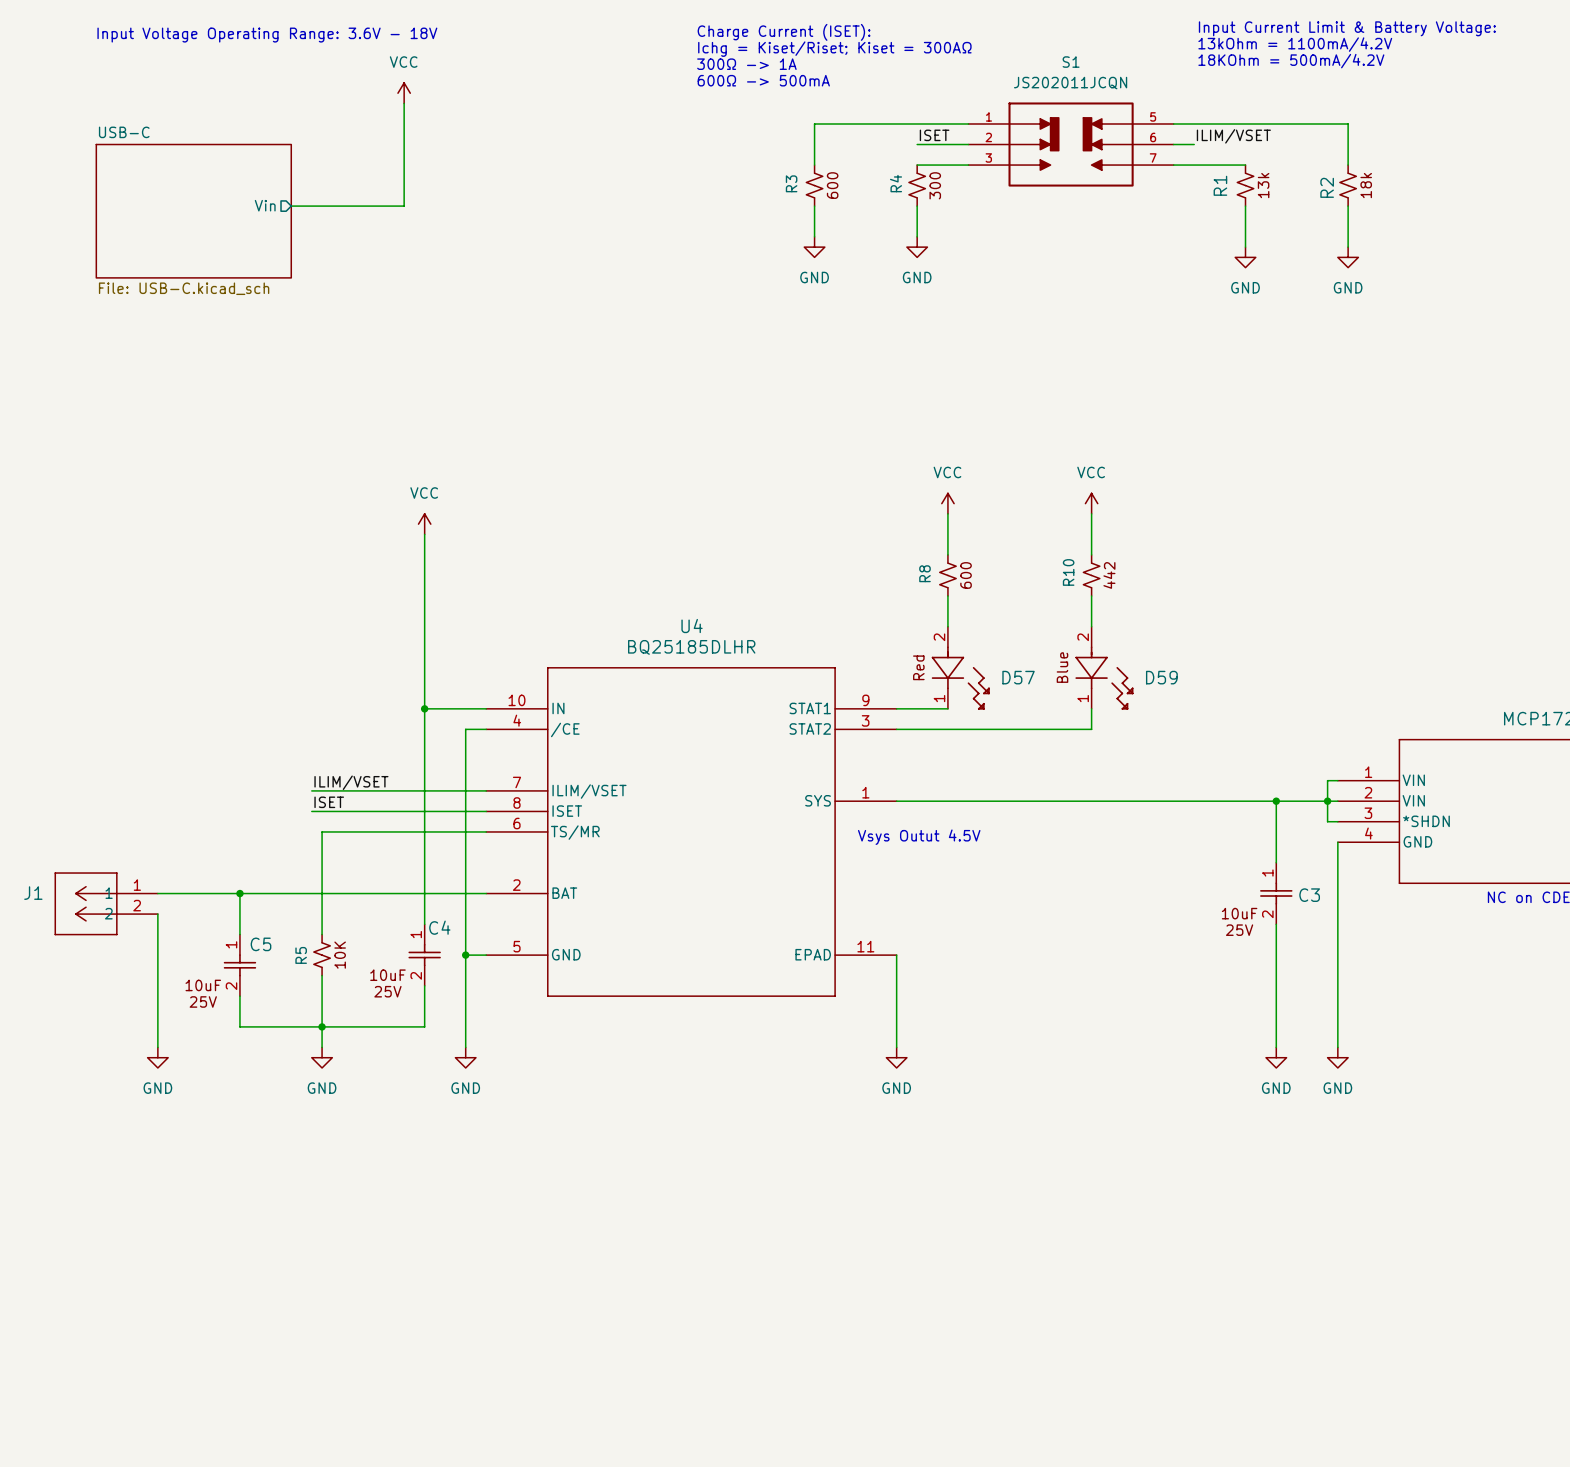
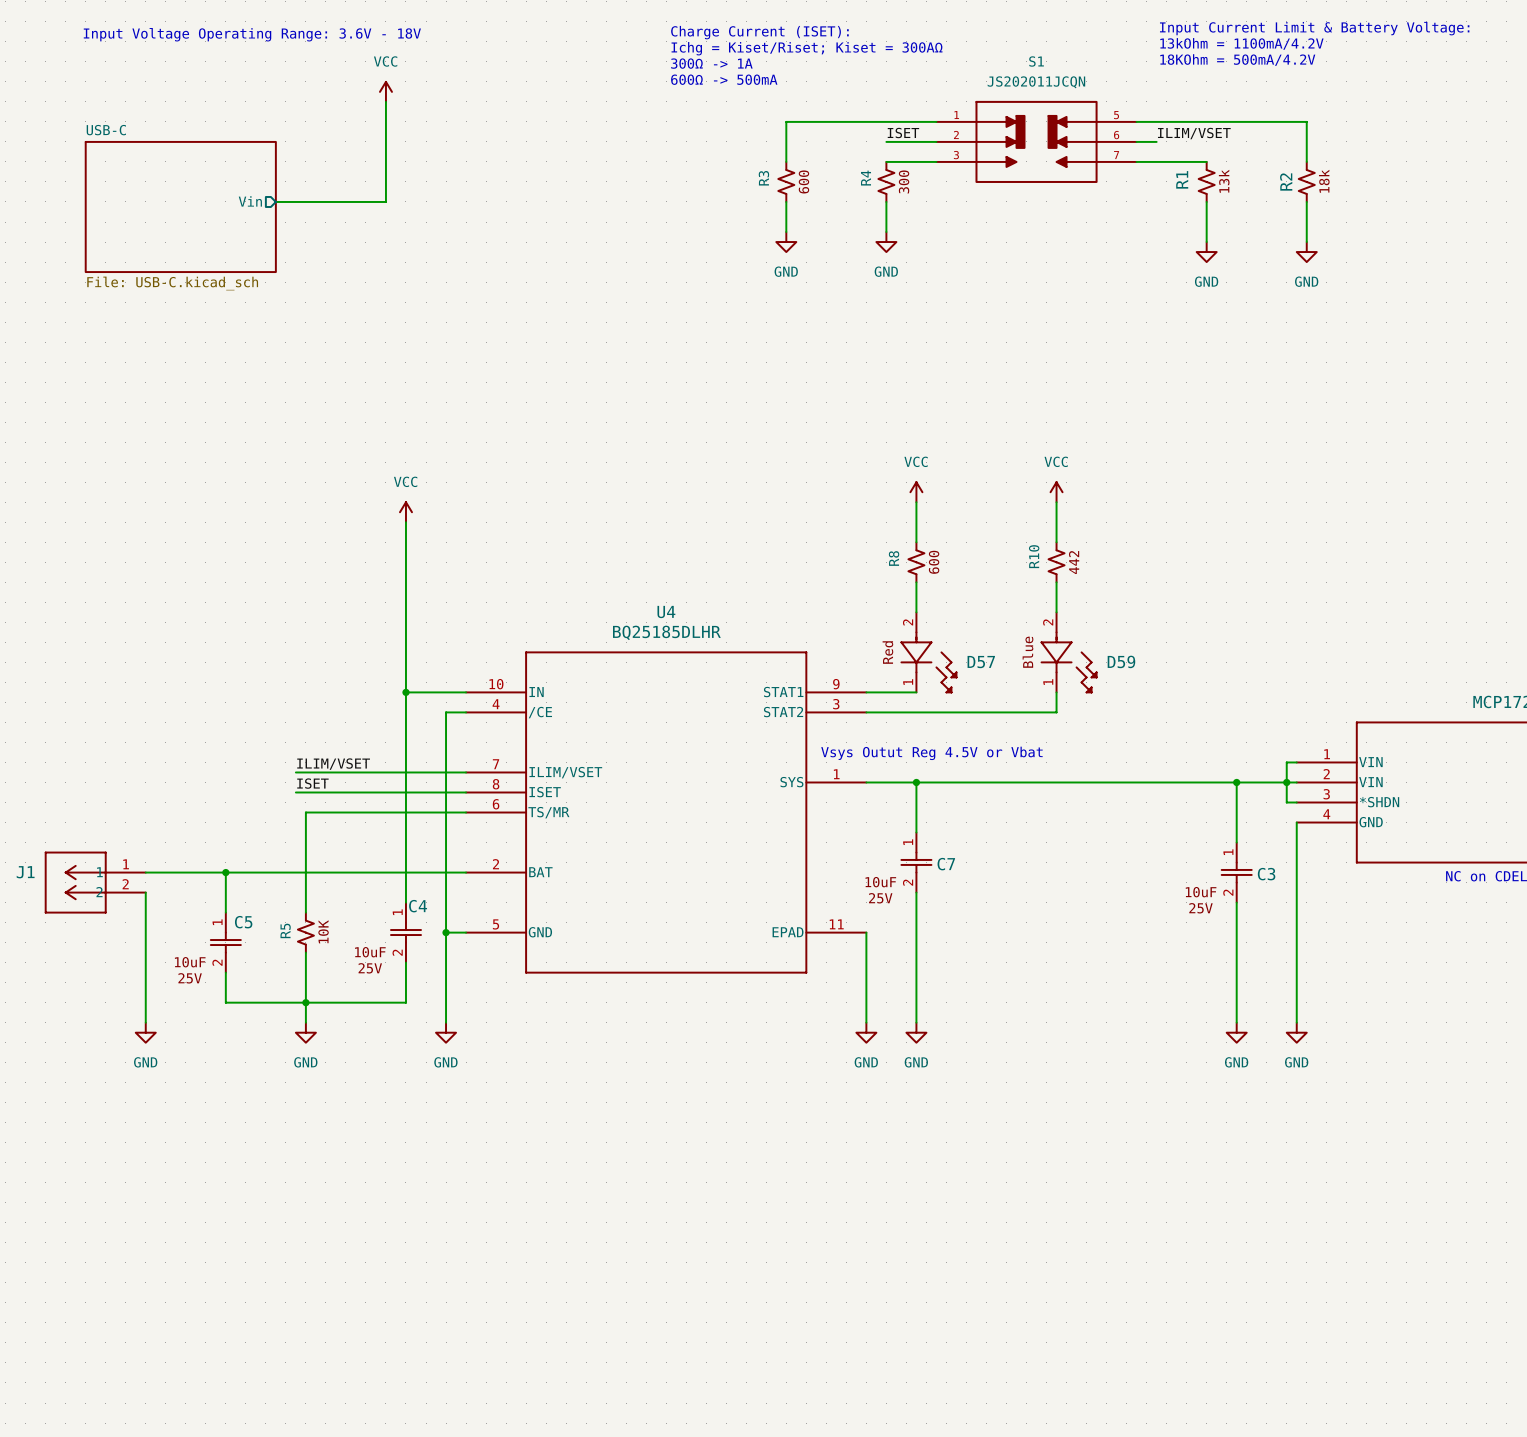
text: none -> Vsys Outut Reg 4.5V or Vbat (931, 753)
wire: none -> (916, 782) (916, 832)
junction: none -> (916, 782)
text: Vsys Outut 4.5V (919, 837) -> none
C7: none -> (916, 862)
wire: none -> (916, 892) (916, 1022)
power symbol: none -> GND (916, 1032)

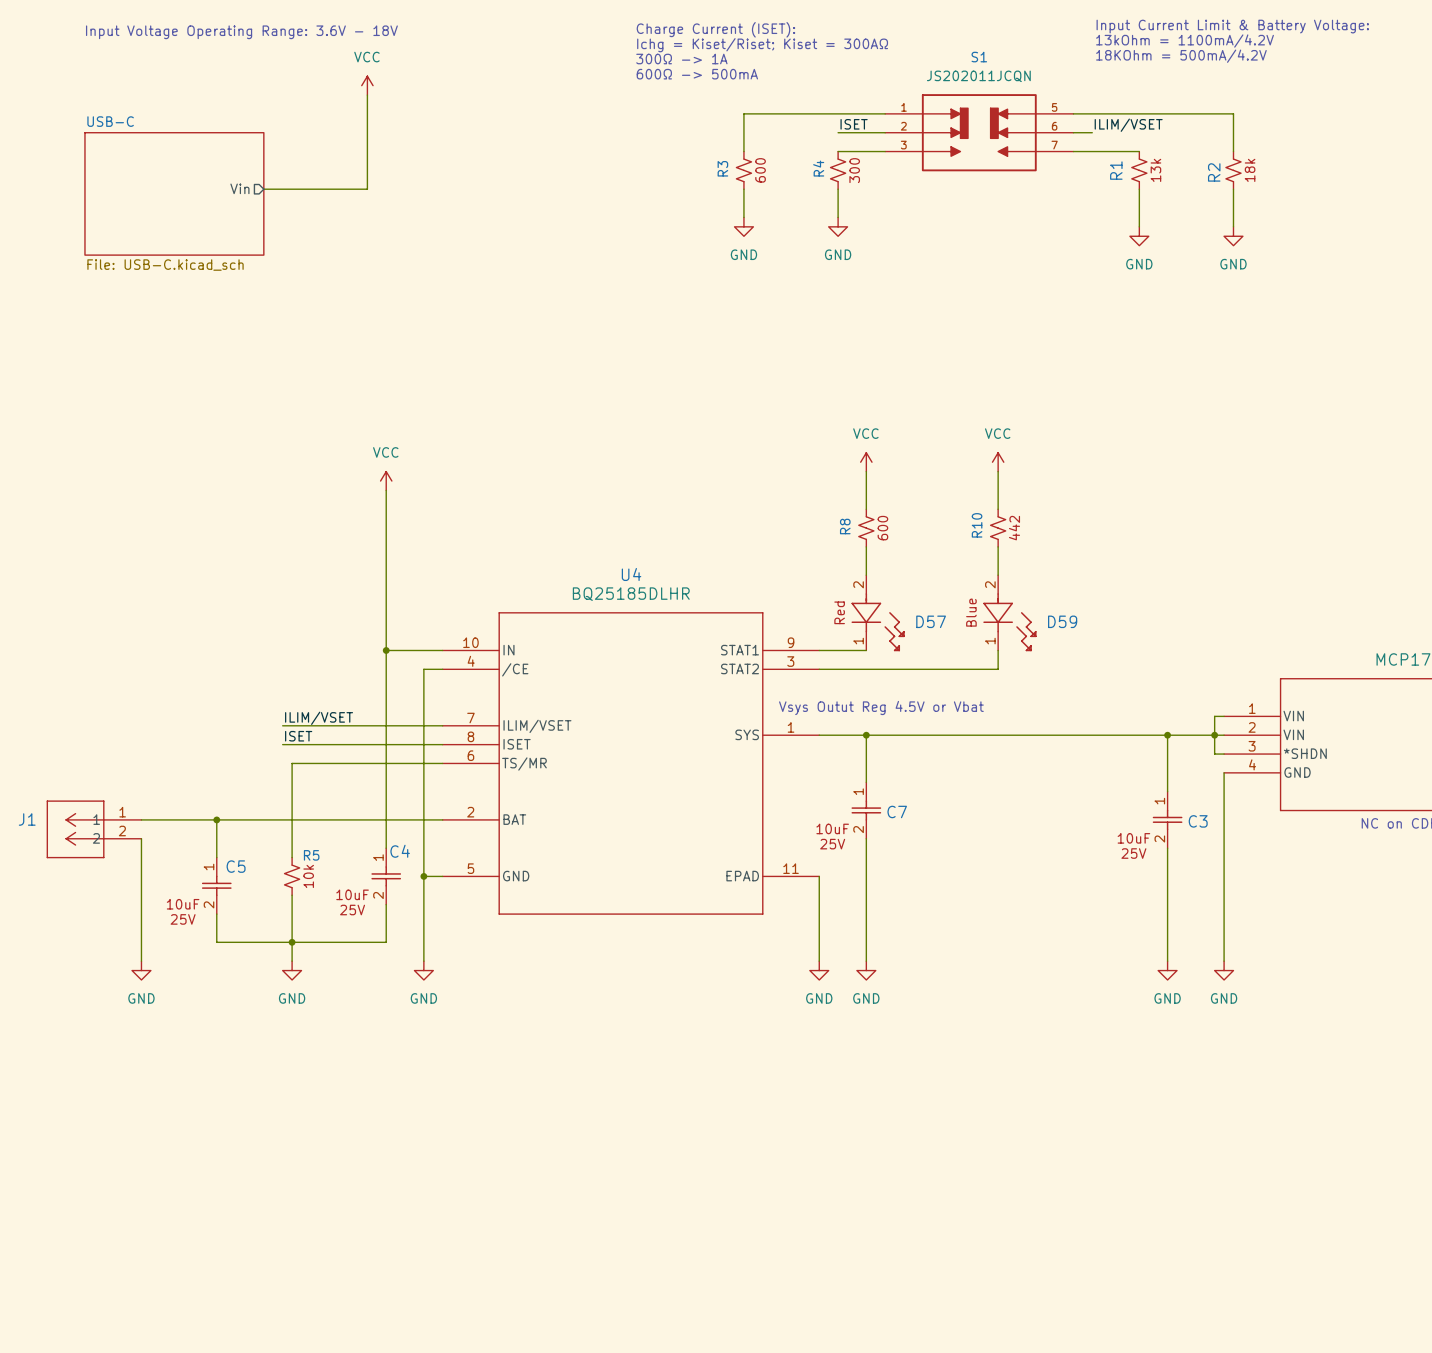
R5 name rotation: 0° (285, 930) -> 90° clockwise (311, 855)
R5 name position: R5 (285, 930) -> R5 (311, 855)
R5 text: 10K (323, 931) -> 10k (308, 876)

